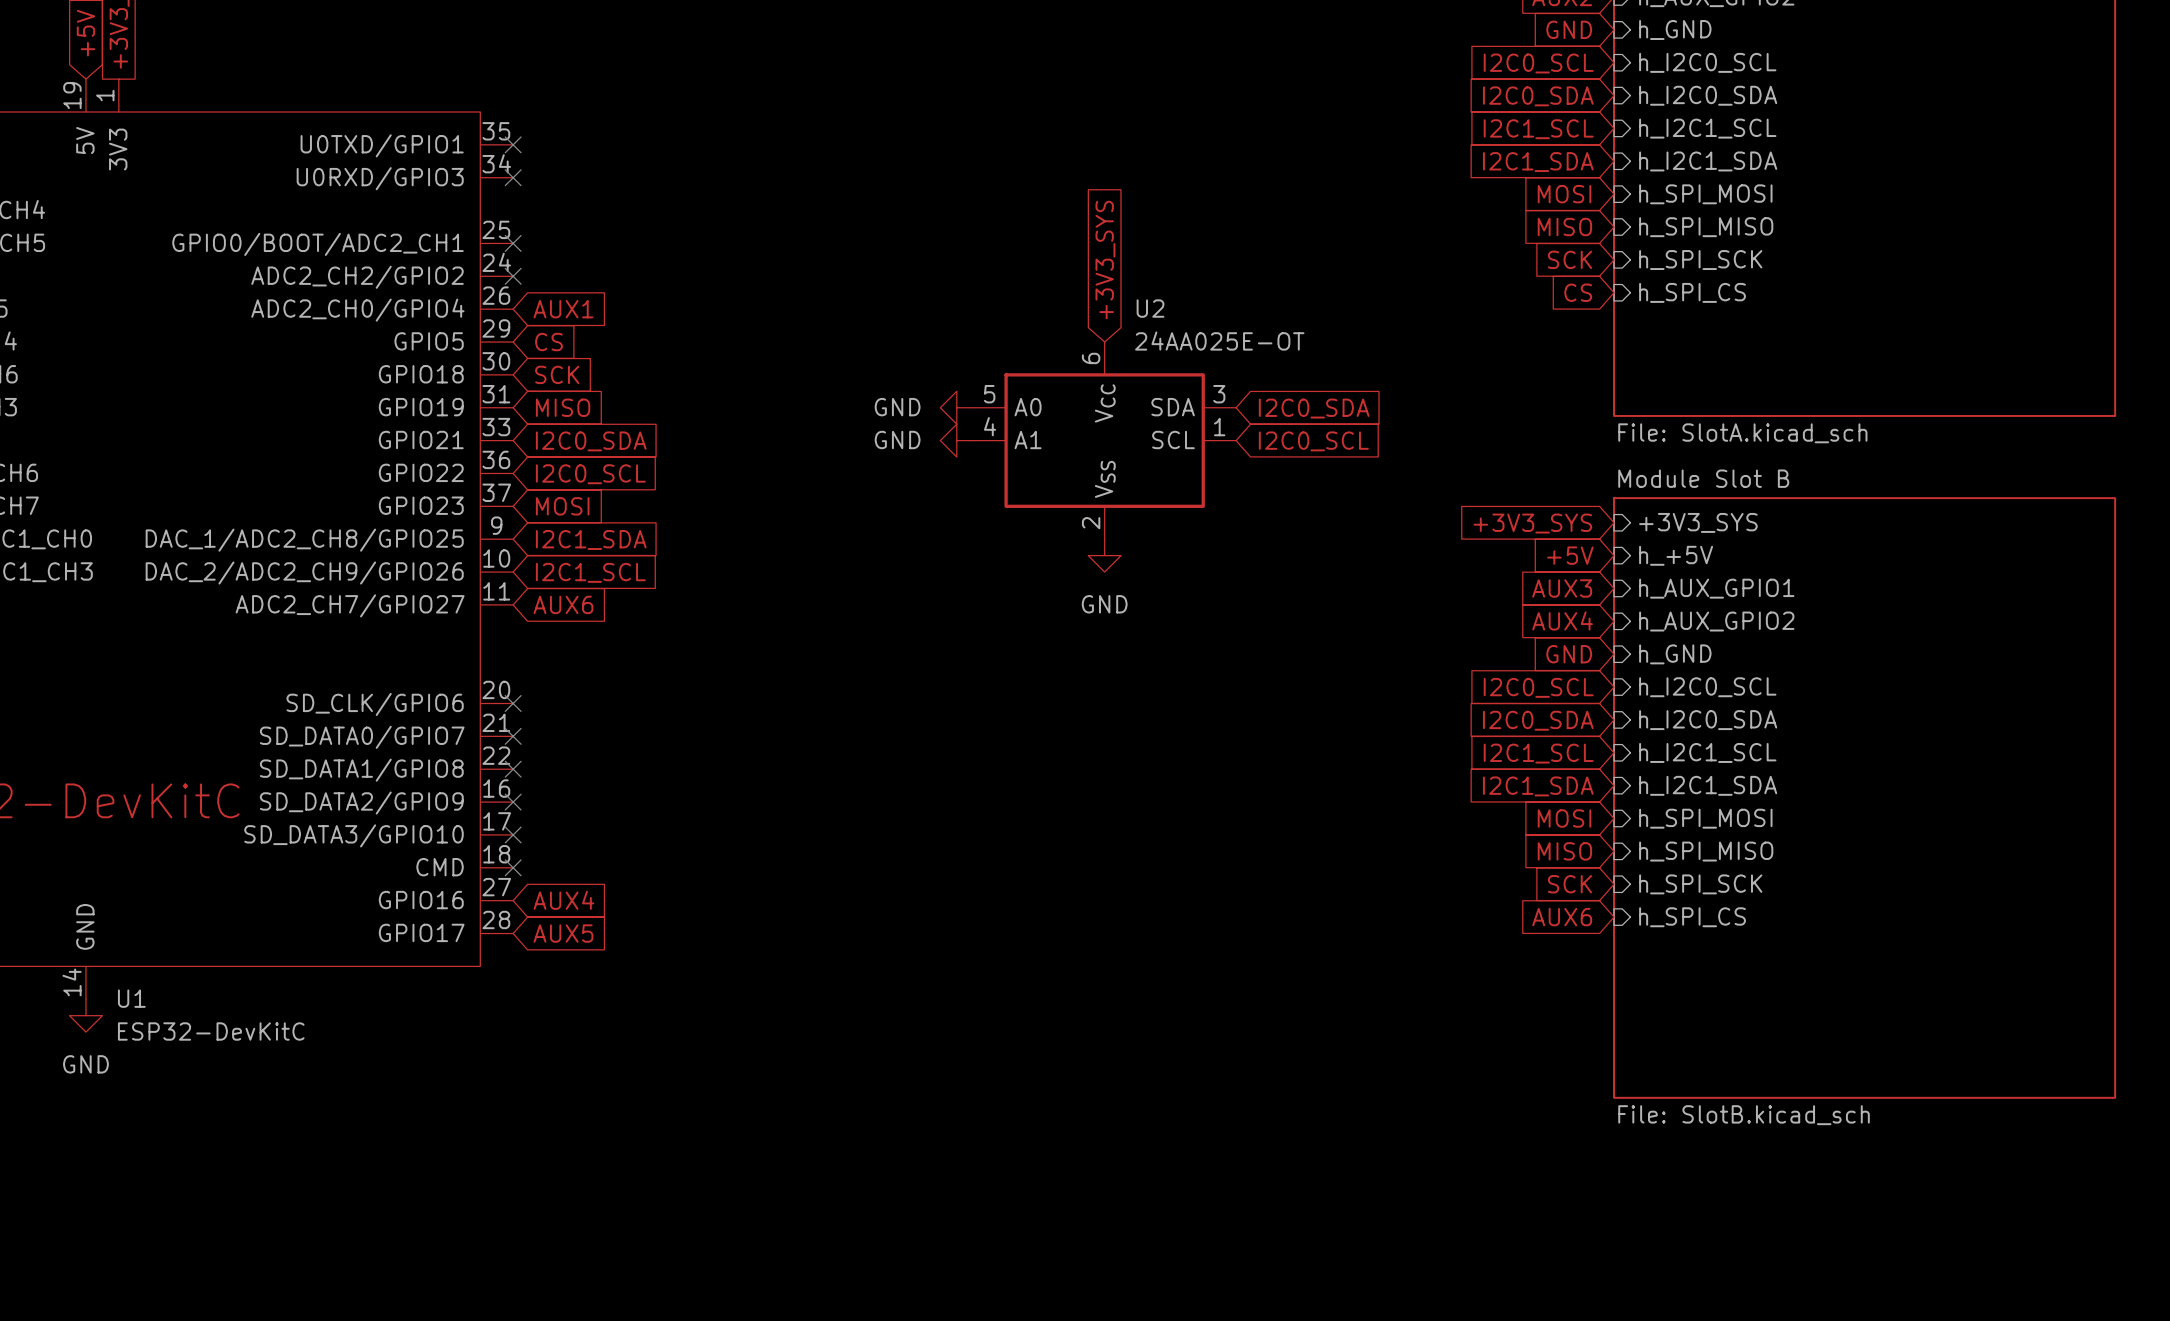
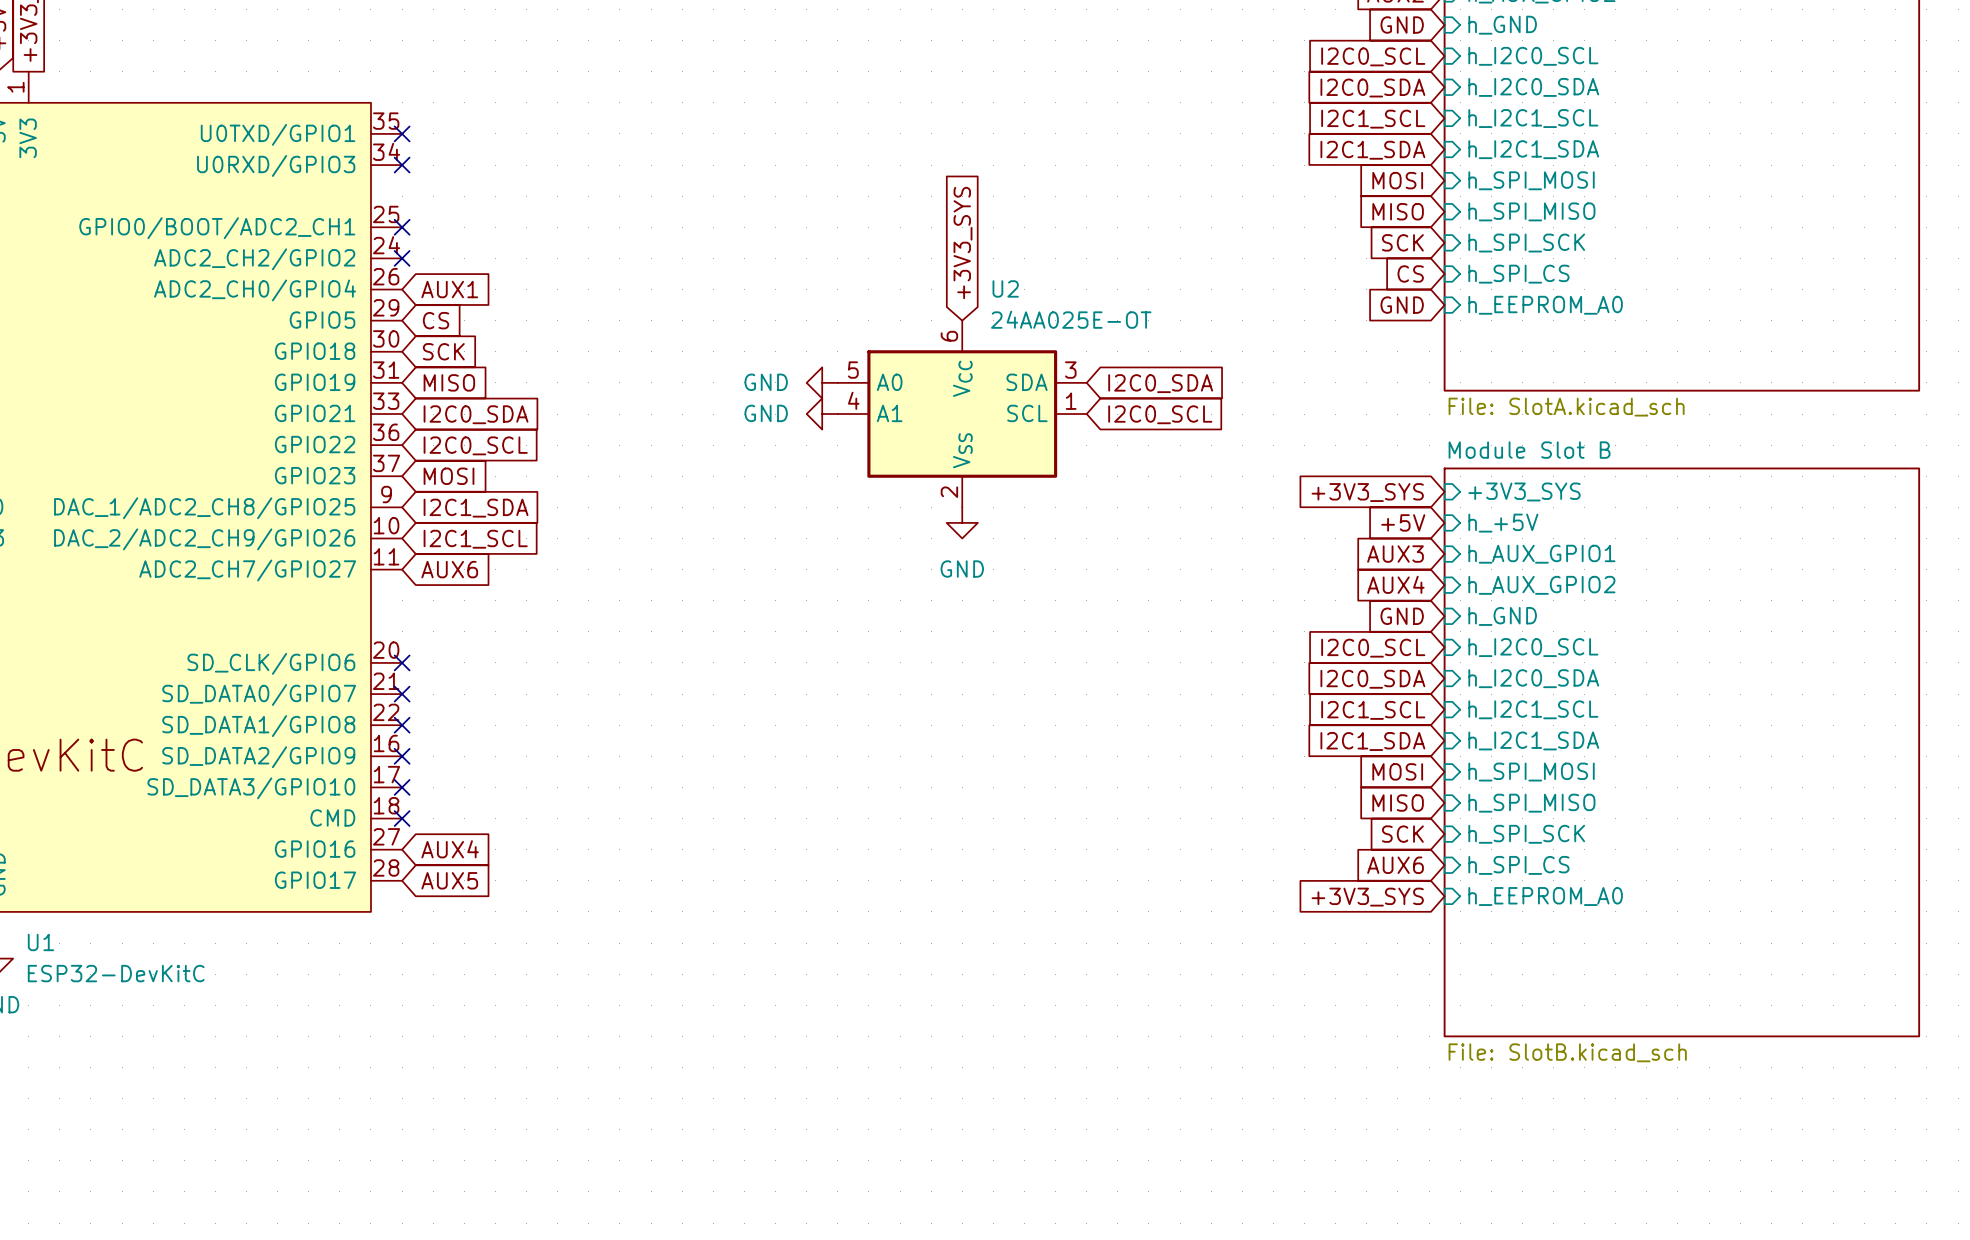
global label: none -> GND (1402, 305)
sheet pin: none -> h_EEPROM_A0 (1545, 305)
global label: none -> +3V3_SYS (1367, 897)
sheet pin: none -> h_EEPROM_A0 (1545, 896)

